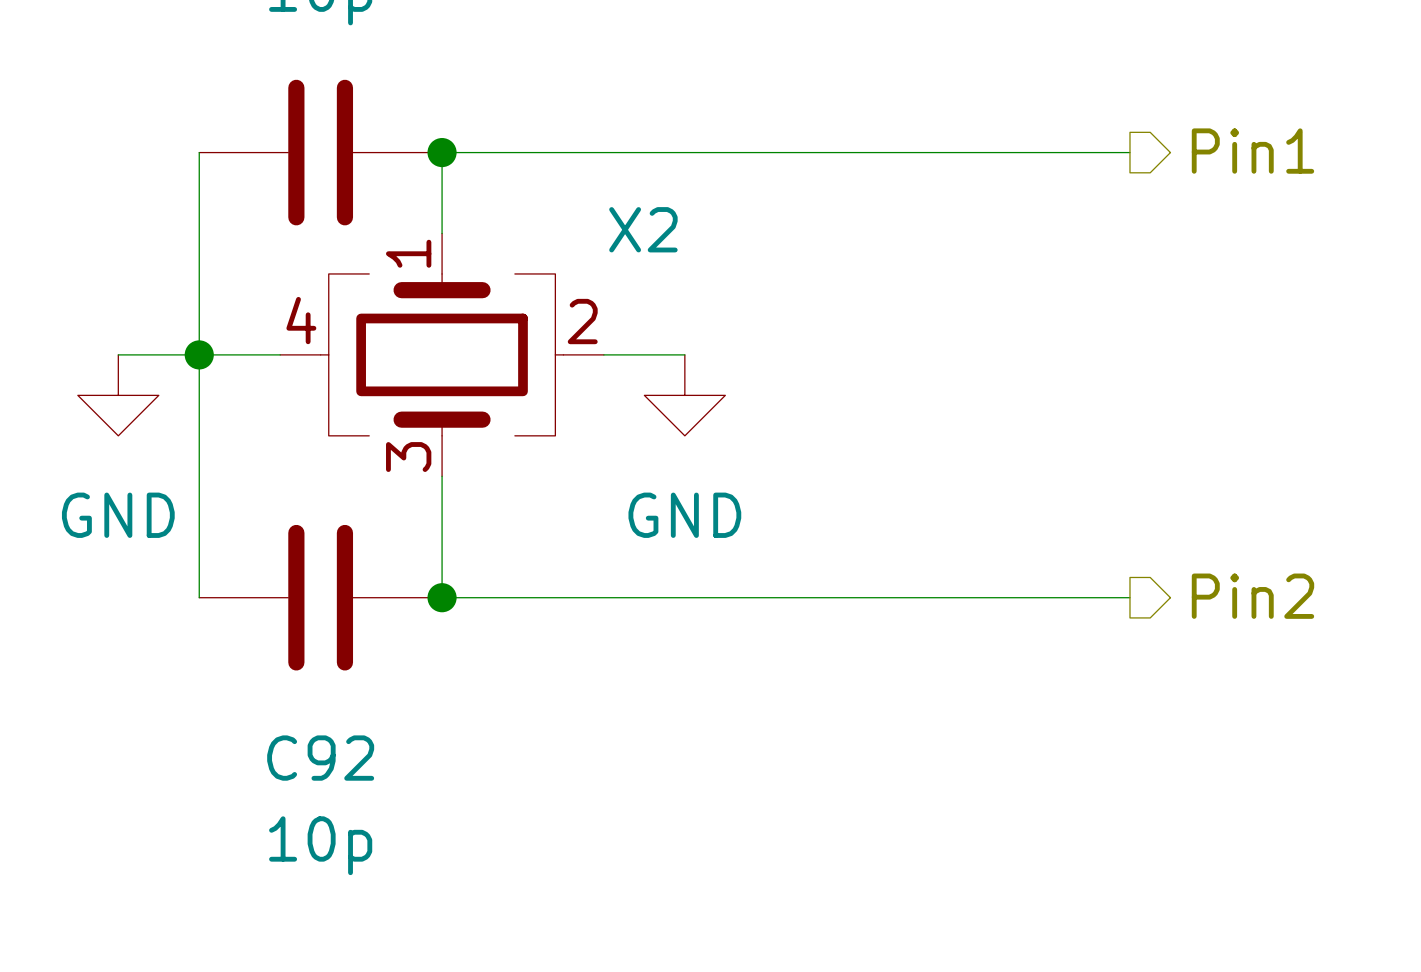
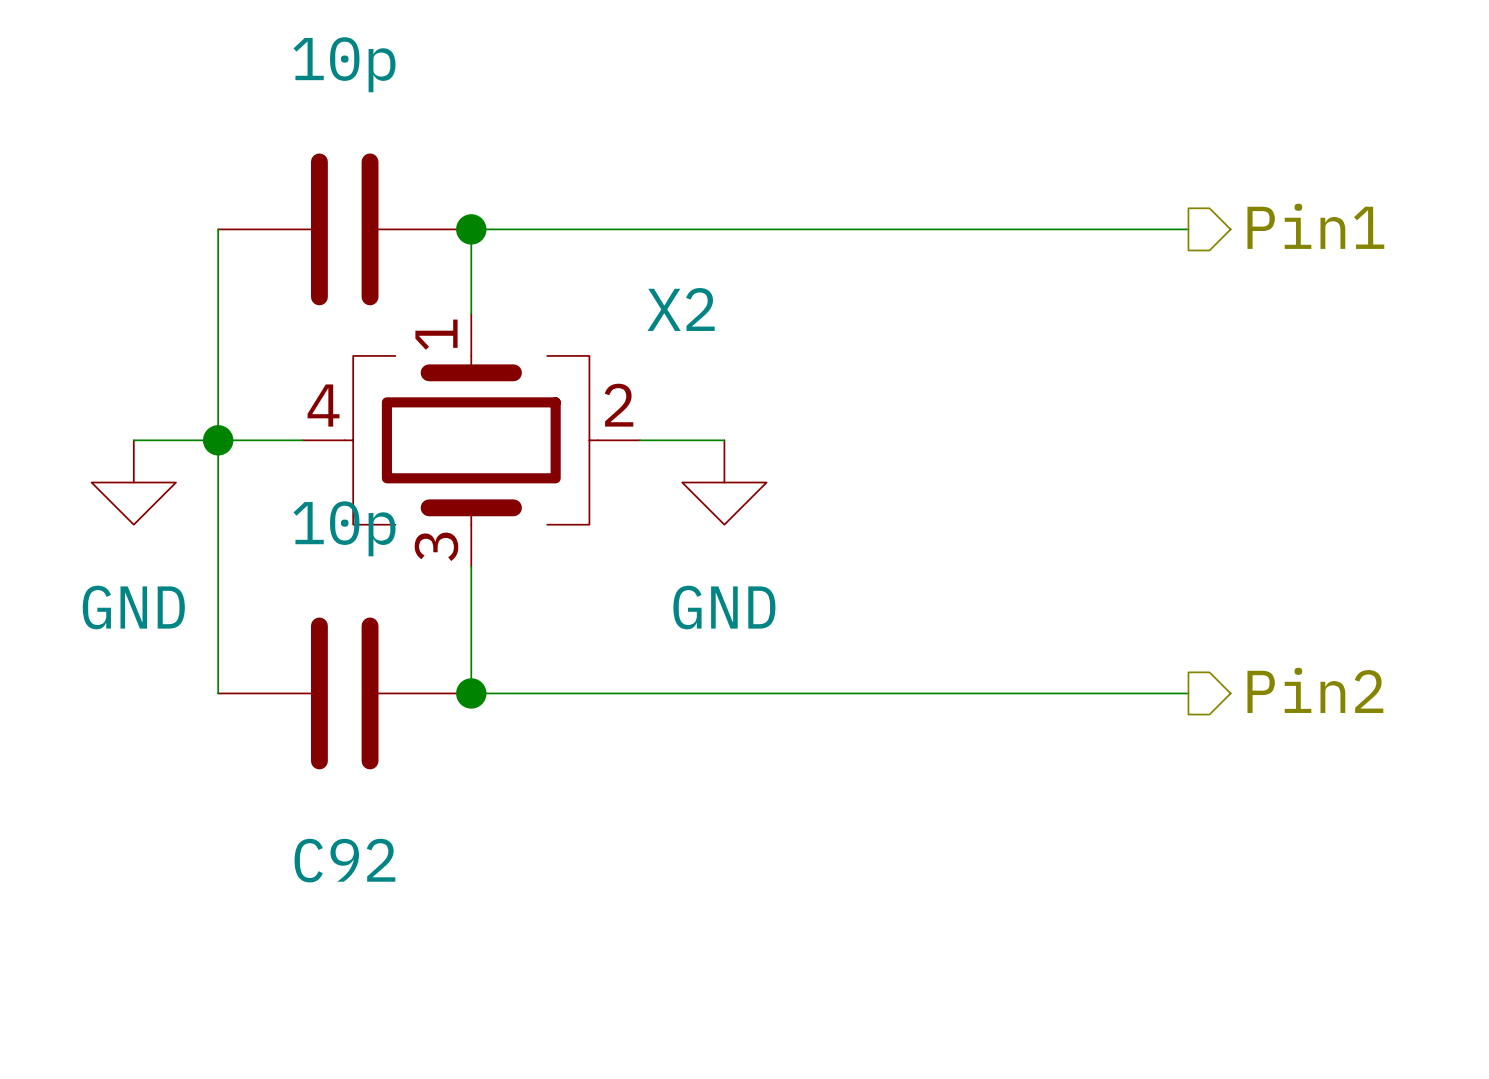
C92 value position: 10p (320, 845) -> 10p (344, 528)

